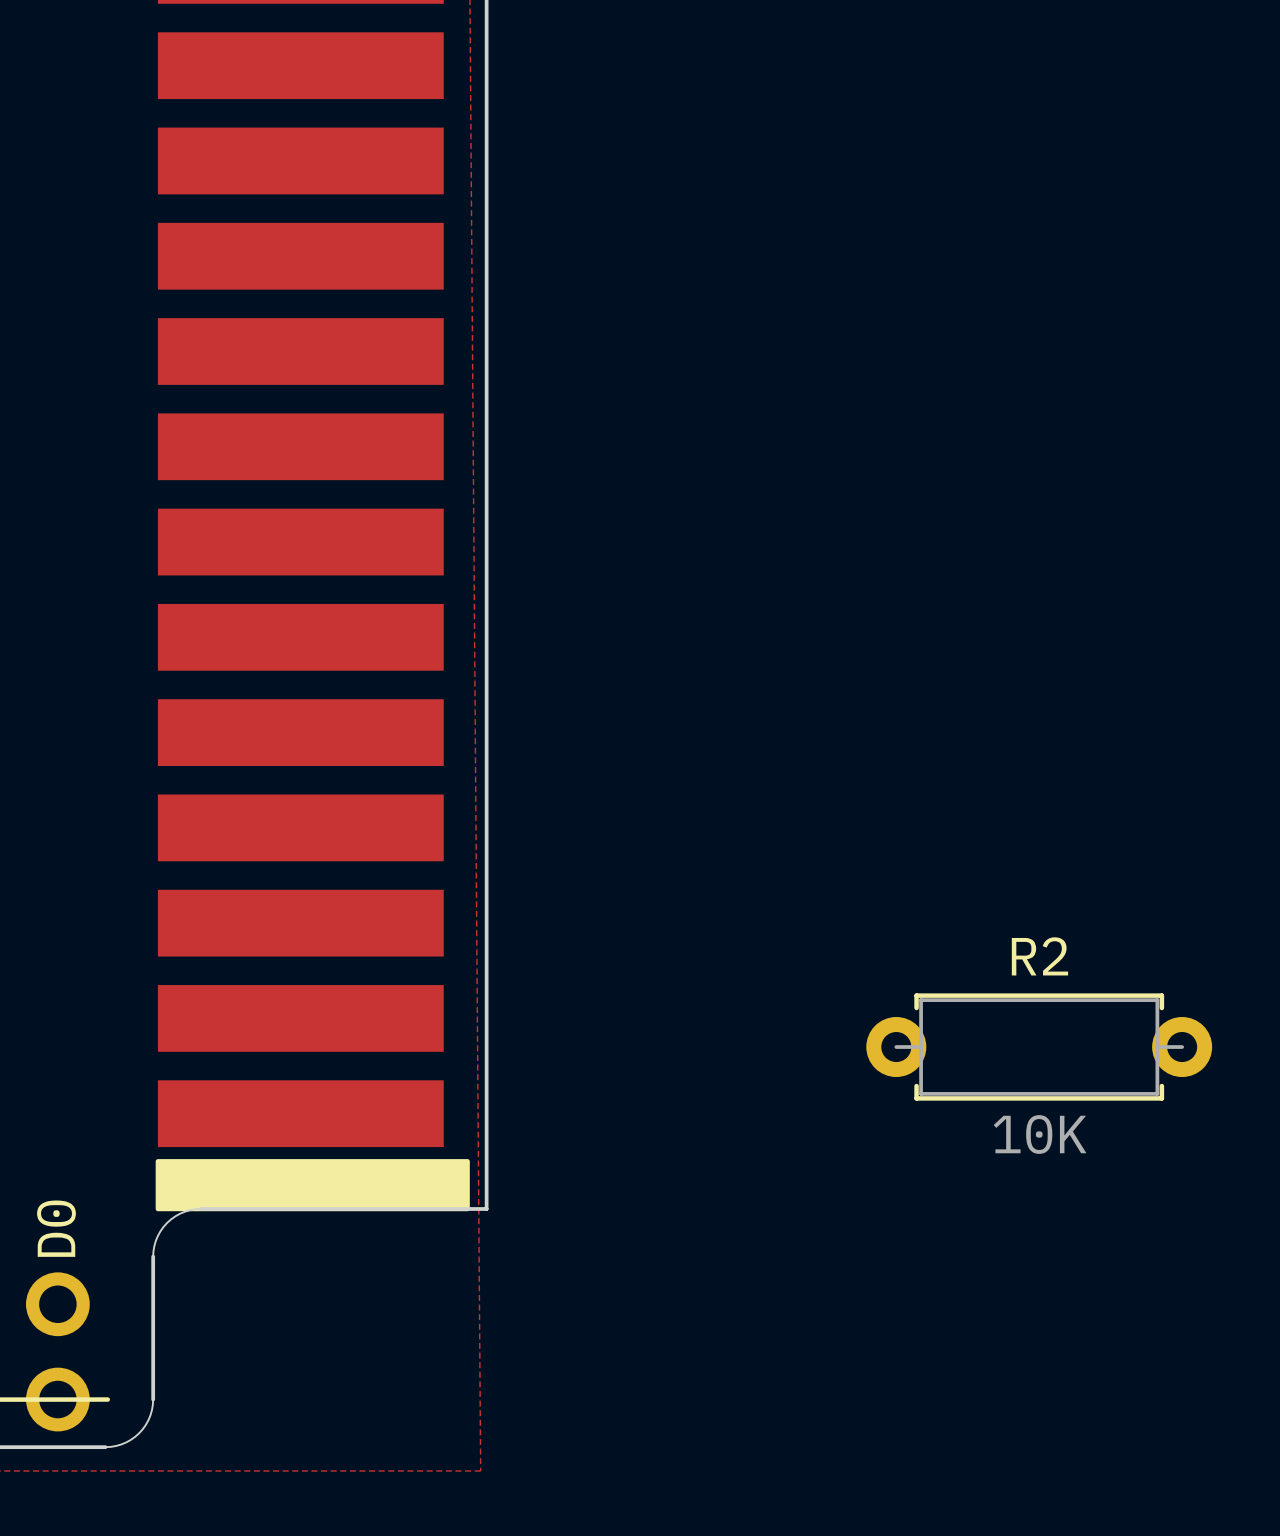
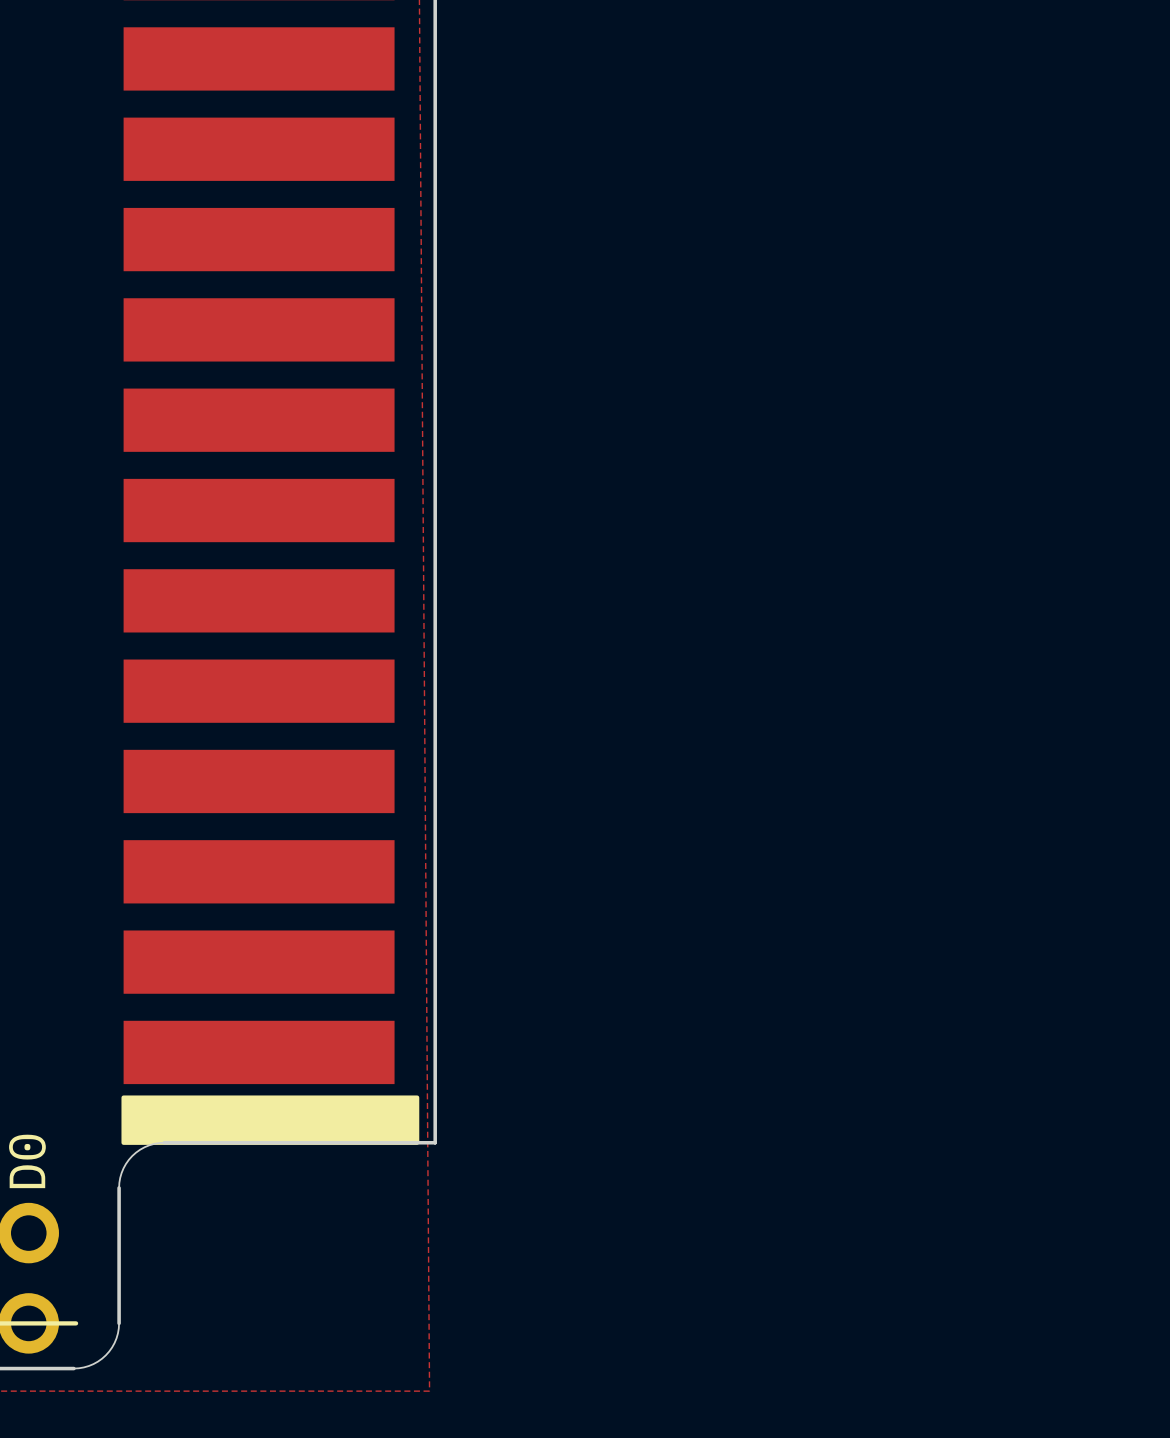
R2: 10K (1039, 1047) -> none

